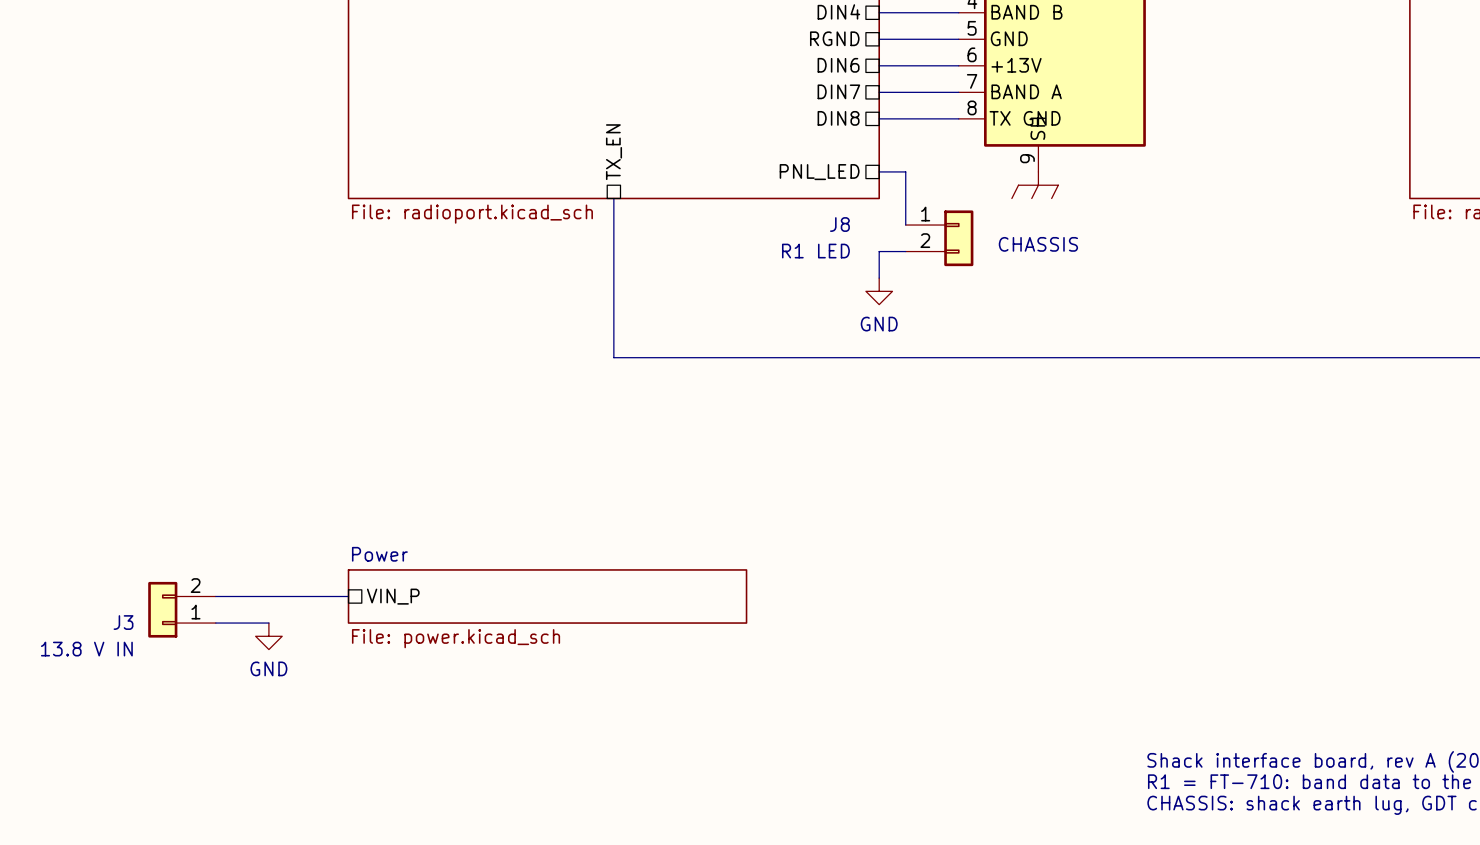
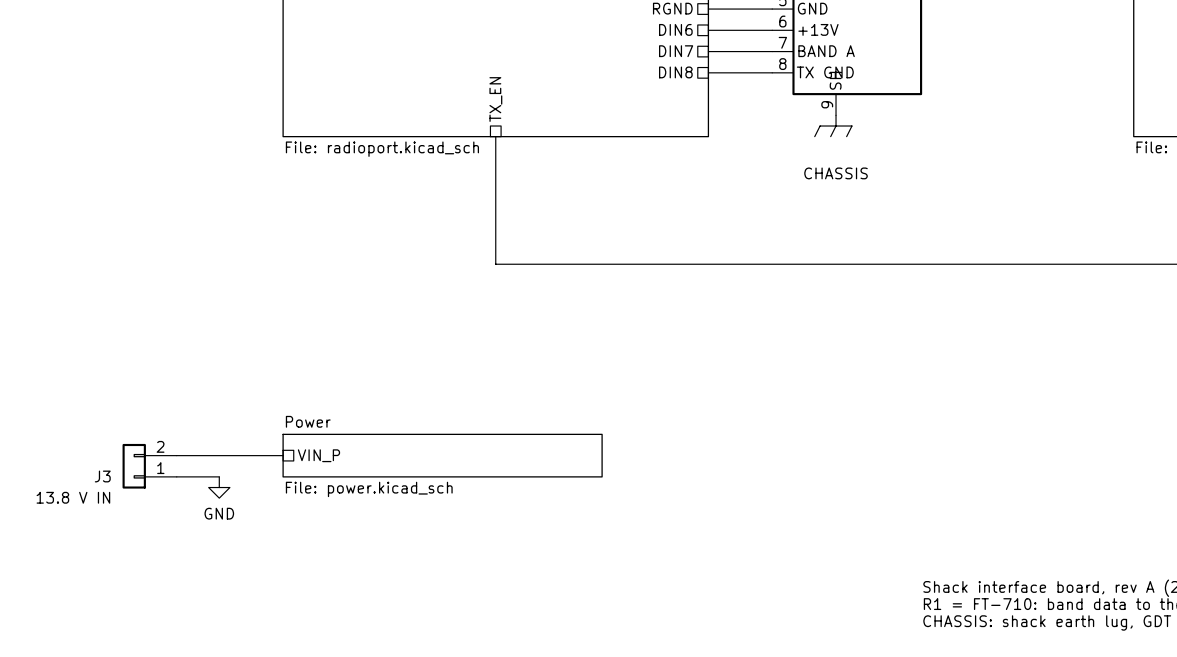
wire: (879, 171) (905, 171) (905, 225) -> none
sheet pin: PNL_LED (819, 172) -> none
J8: R1 LED (939, 238) -> none
wire: (905, 251) (879, 251) (879, 278) -> none
power symbol: GND (879, 291) -> none

